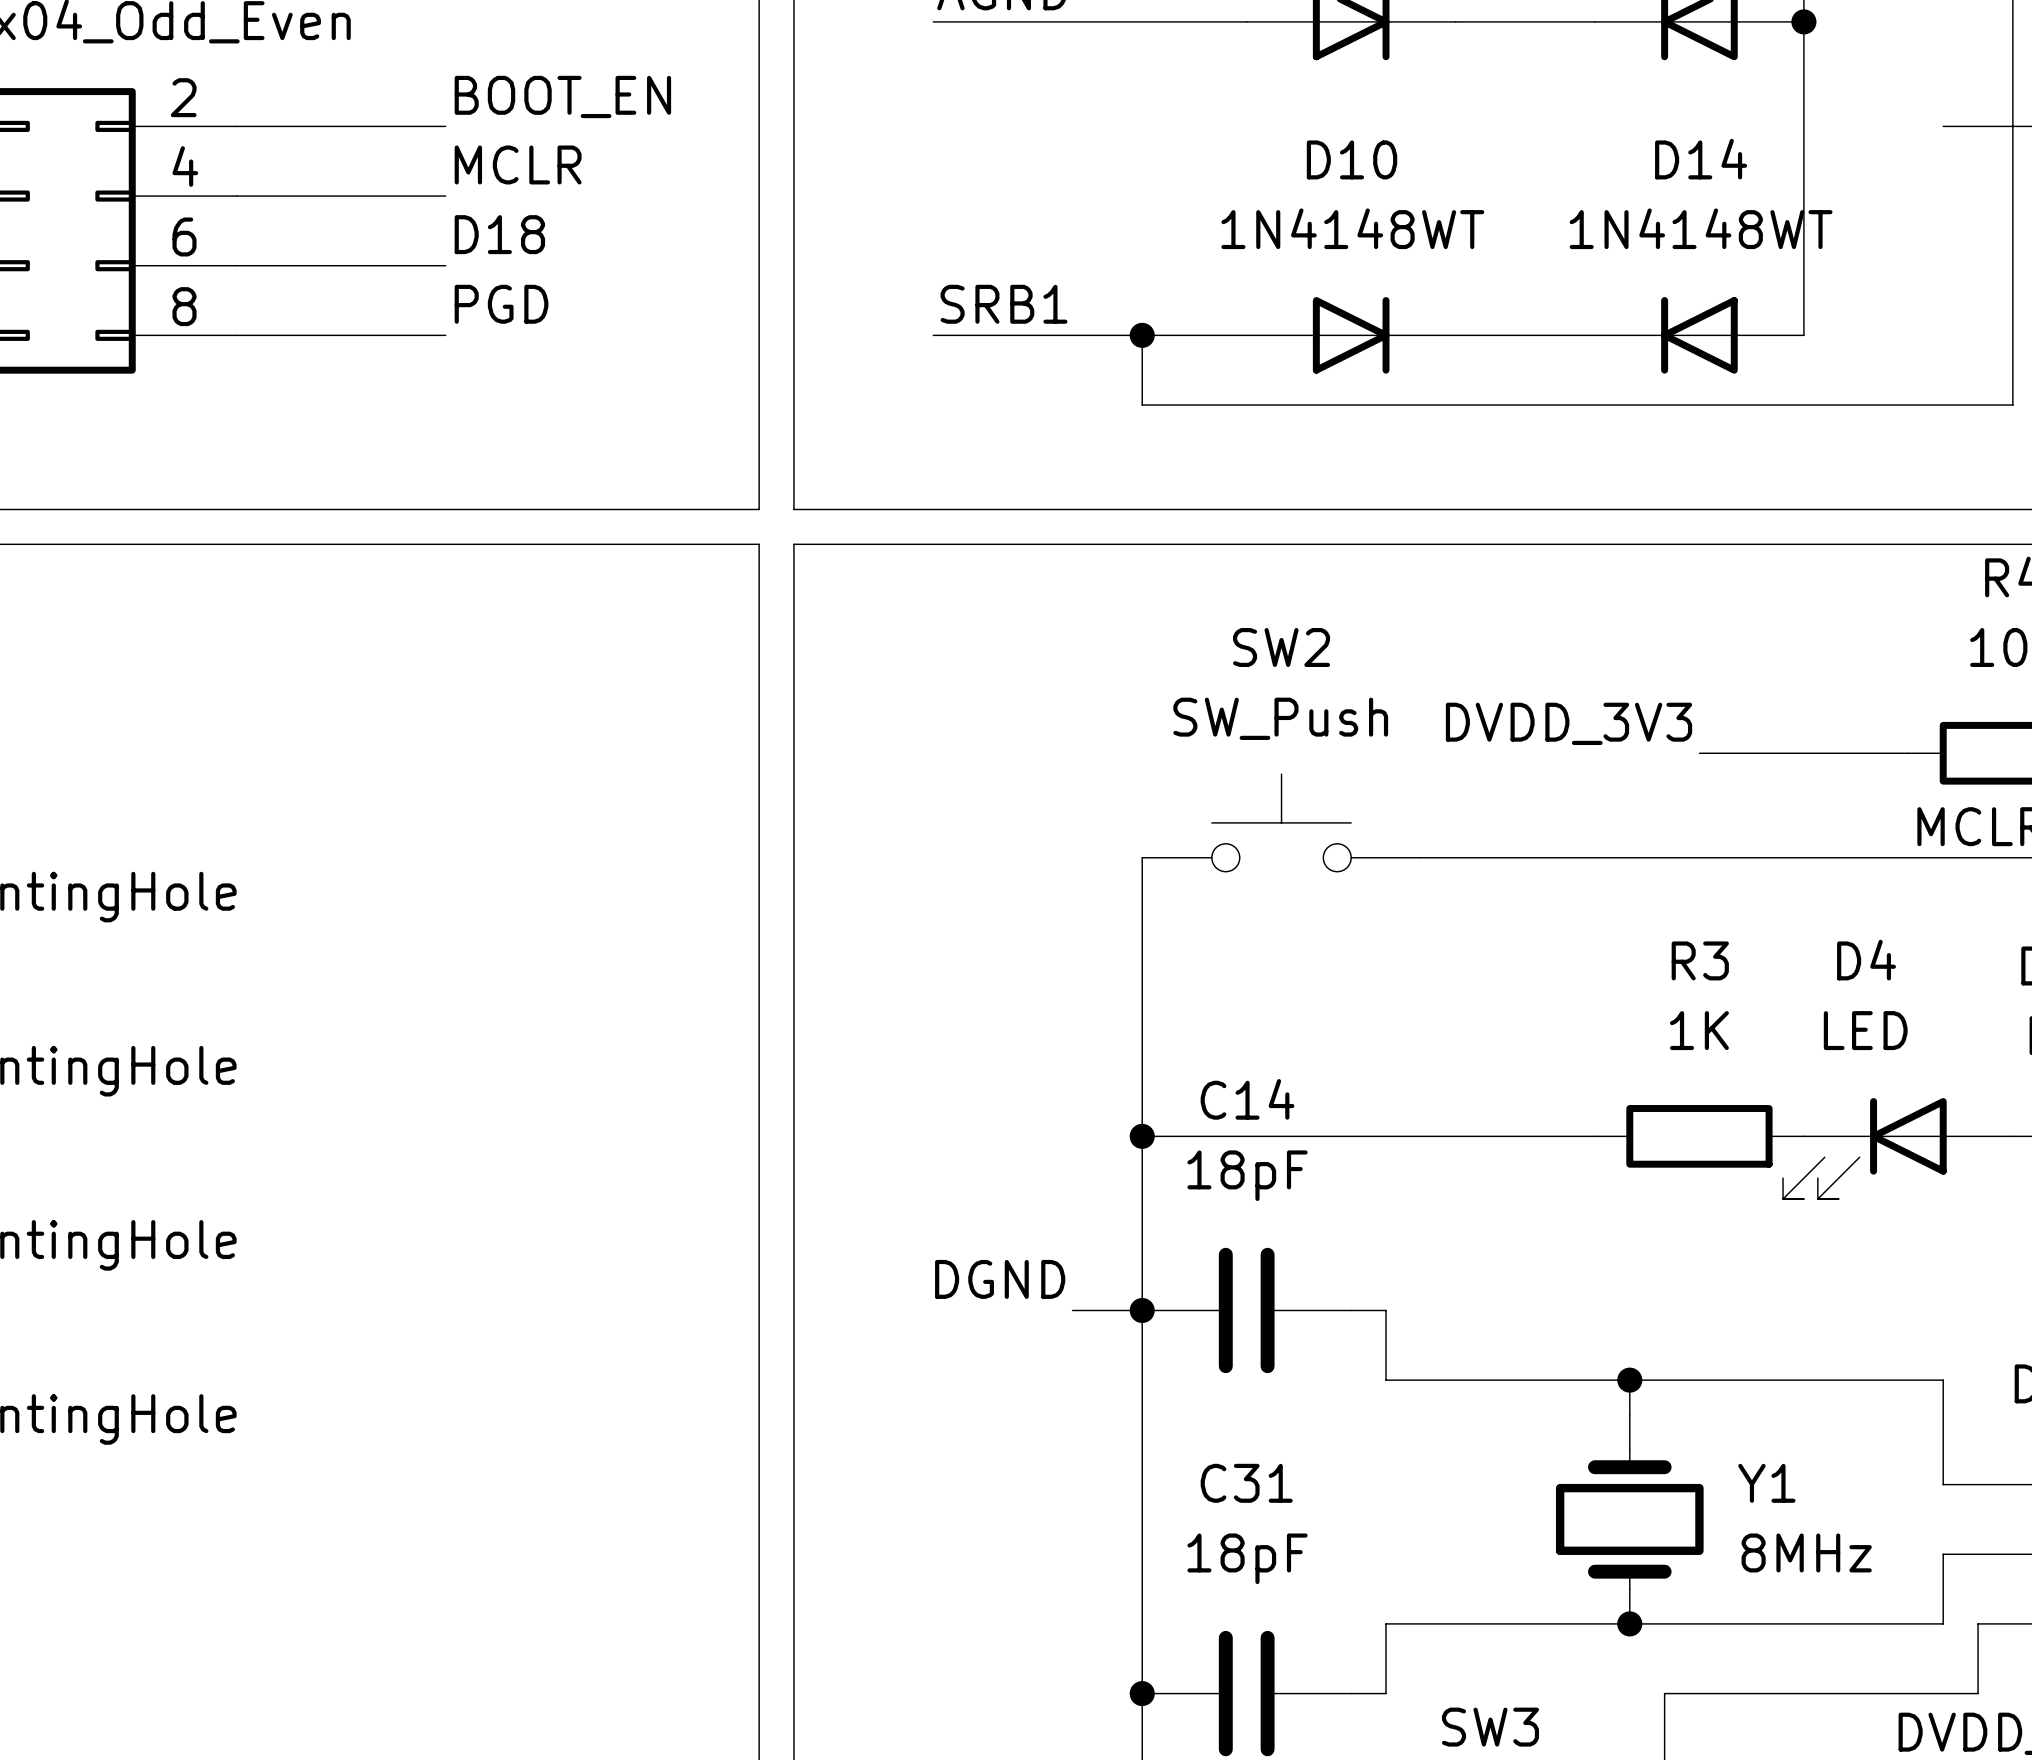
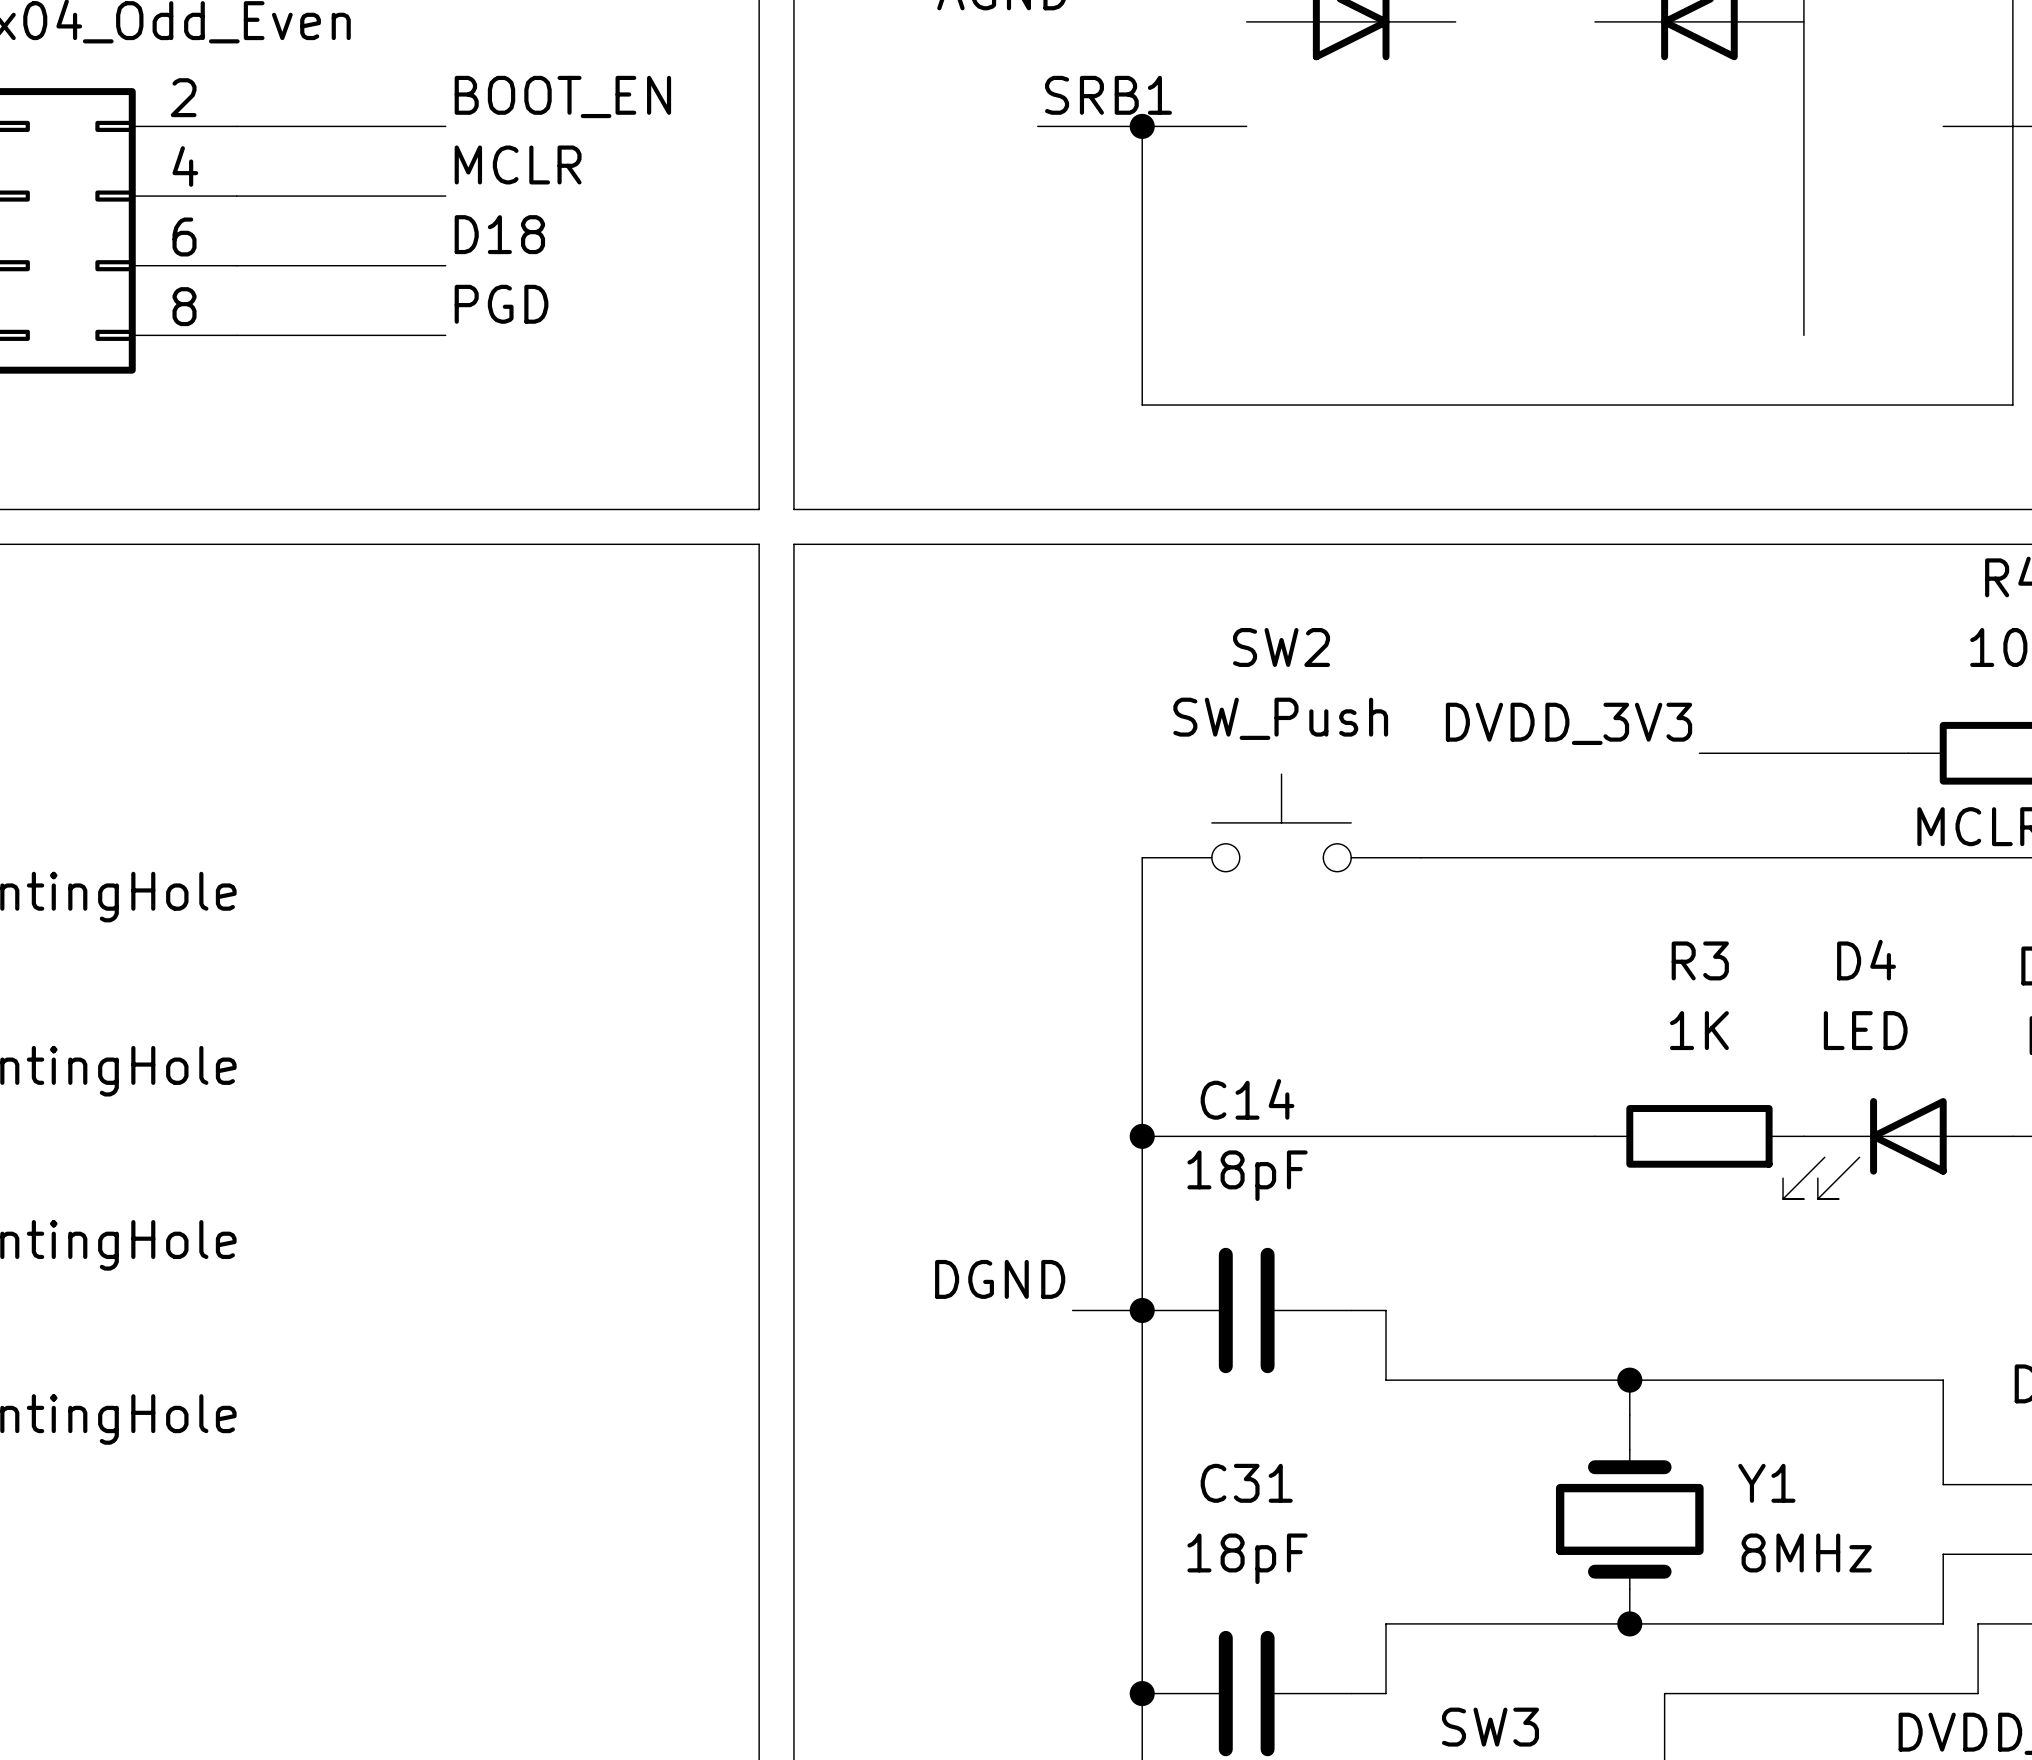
wire: (933, 21) (1246, 21) -> none
wire: (1455, 21) (1594, 21) -> none
junction: (1803, 21) -> none
wire: none -> (1037, 126) (1246, 126)
wire: none -> (1142, 126) (1142, 335)
junction: none -> (1142, 126)
label position: SRB1 (1004, 304) -> SRB1 (1108, 95)
wire: (933, 335) (1246, 335) -> none
junction: (1142, 335) -> none
D10: 1N4148WT (1351, 335) -> none
wire: (1455, 335) (1594, 335) -> none
D14: 1N4148WT (1699, 335) -> none

